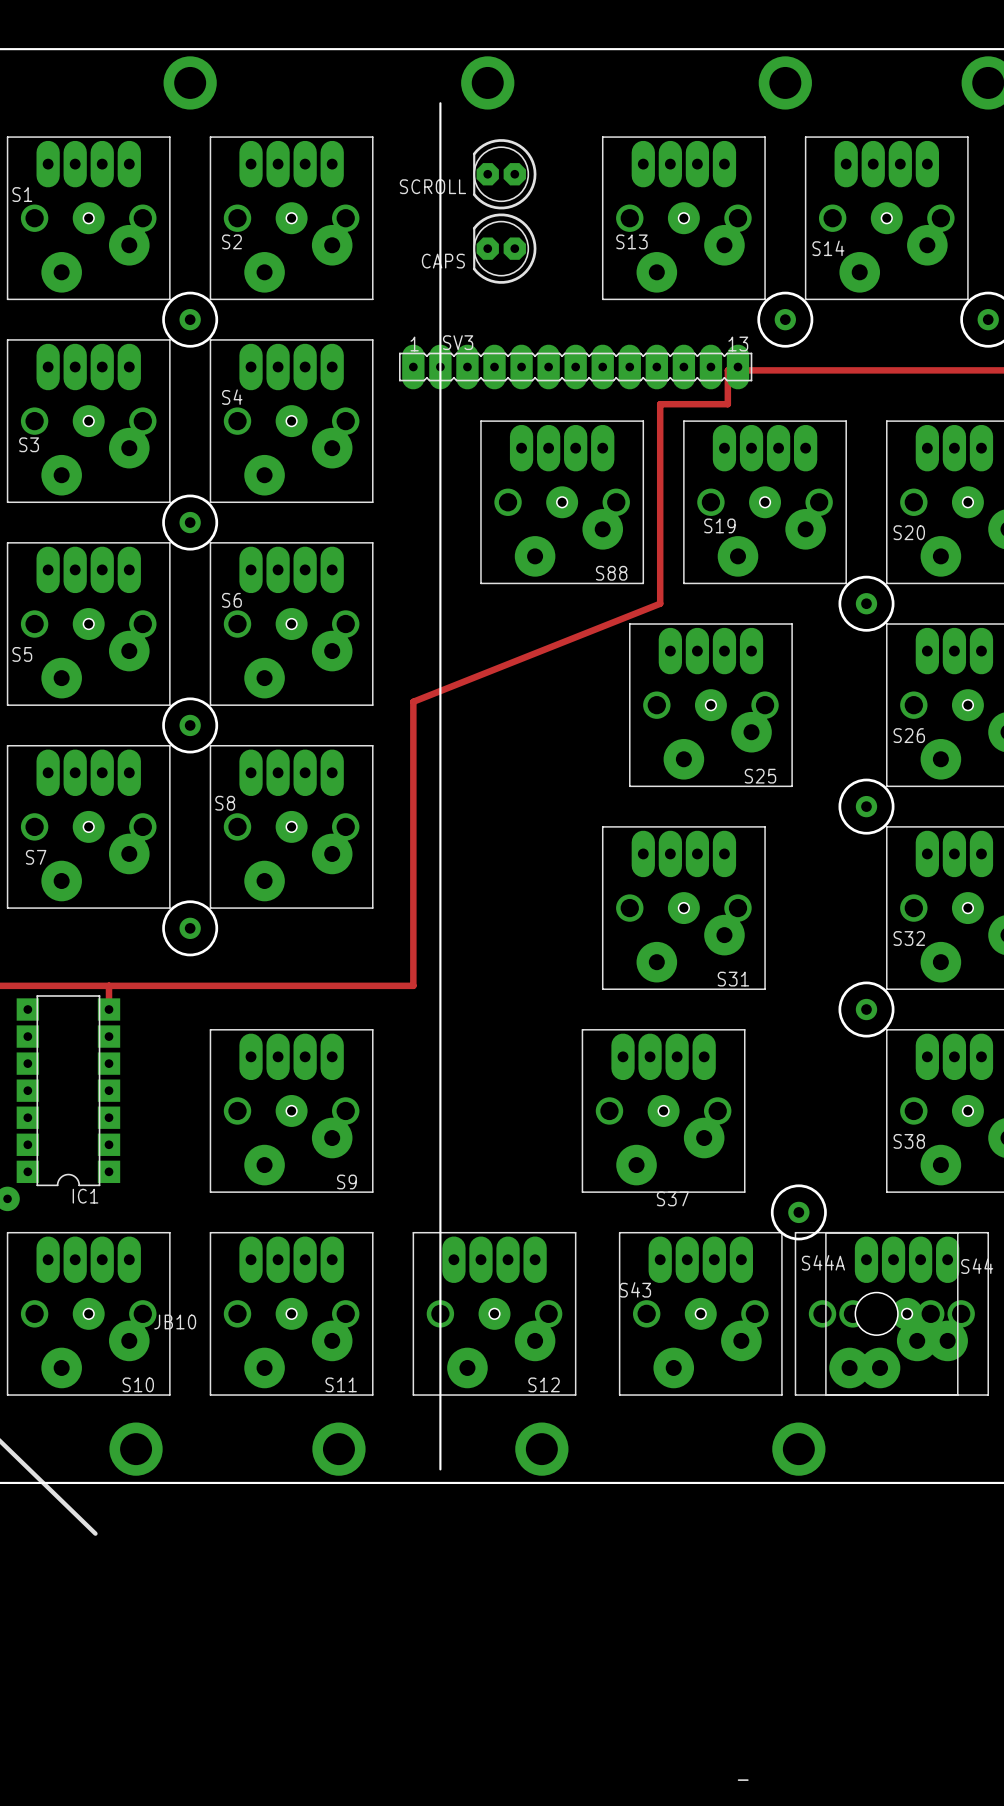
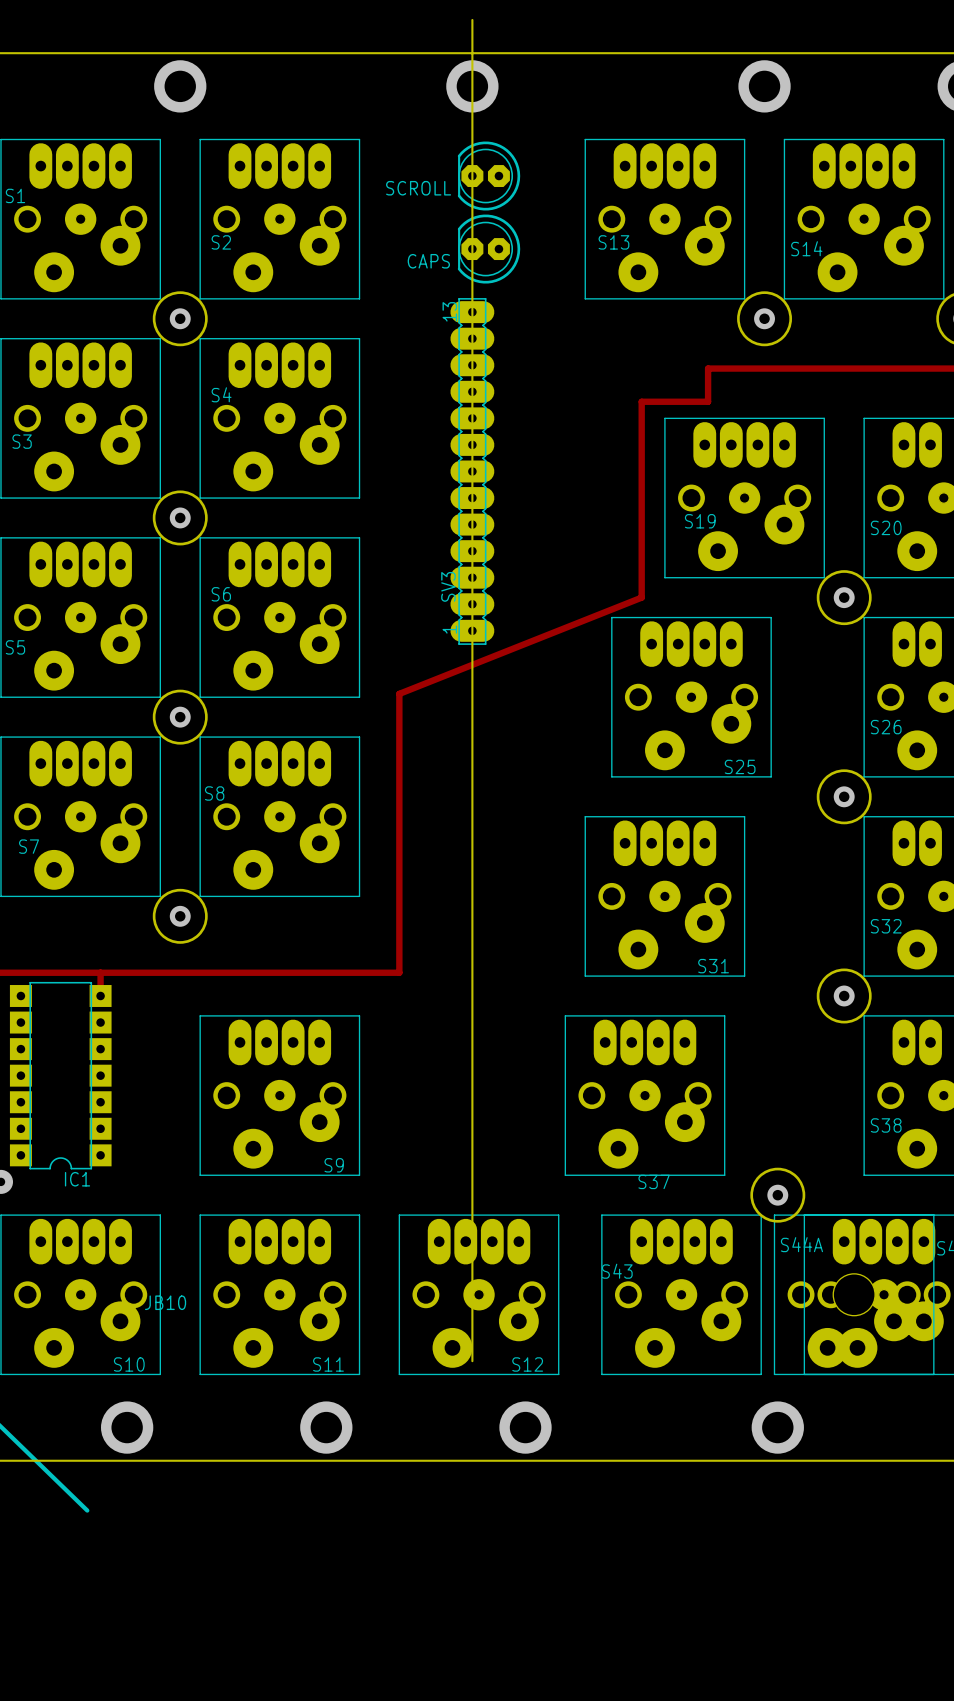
board edge: (440, 103) (440, 1469) -> (472, 19) (472, 1361)
SV3 rotation: 0° (575, 367) -> 90° counterclockwise (472, 471)
S88: (562, 502) -> none

